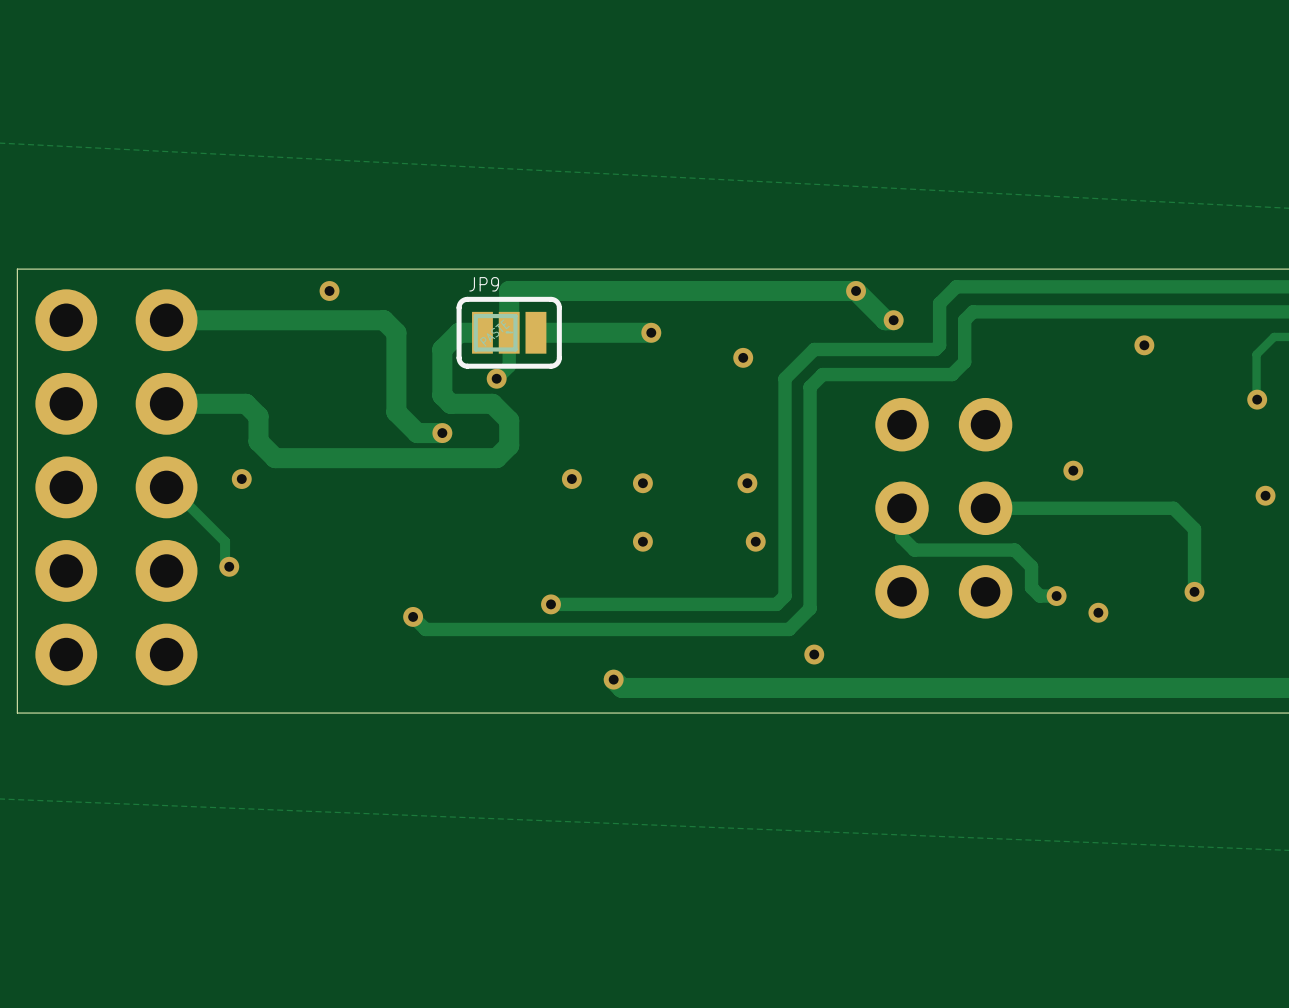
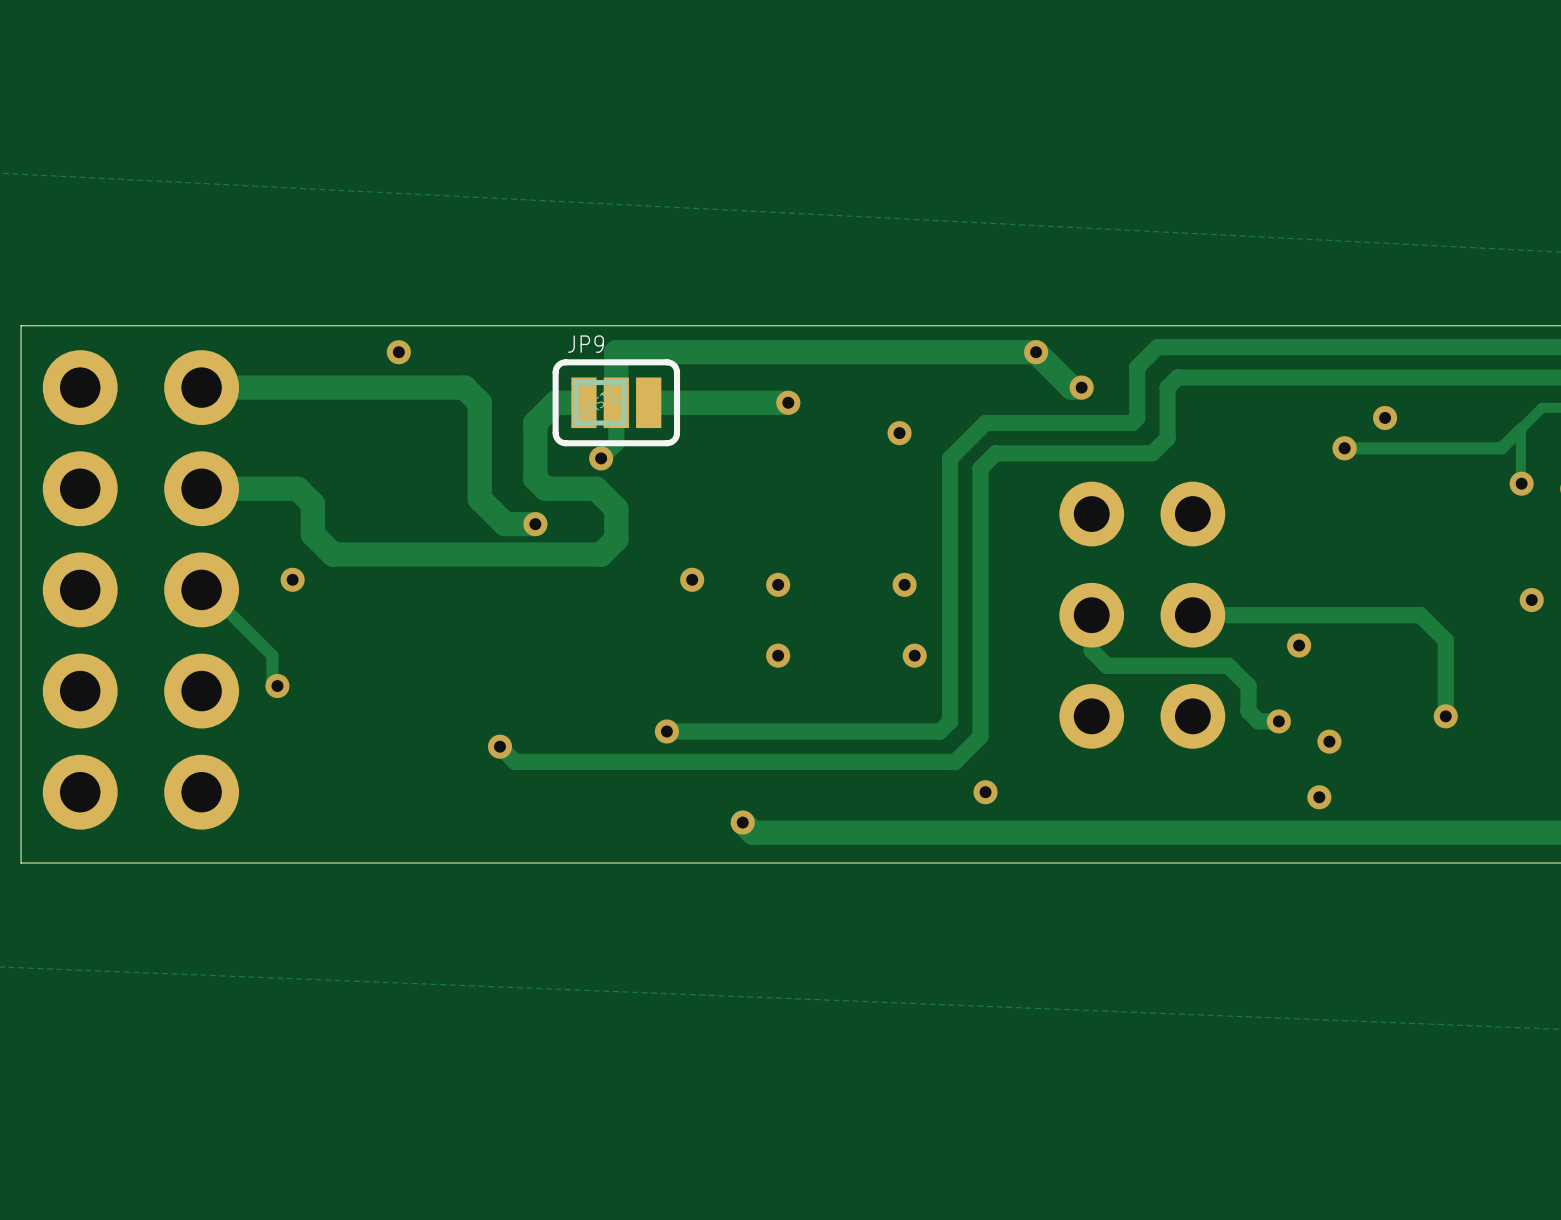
track: none -> (1520, 429) (1501, 448) (1344, 448)
via: none -> (1344, 448)
via: (1073, 470) -> none
via: none -> (1299, 645)
via: none -> (1319, 797)

